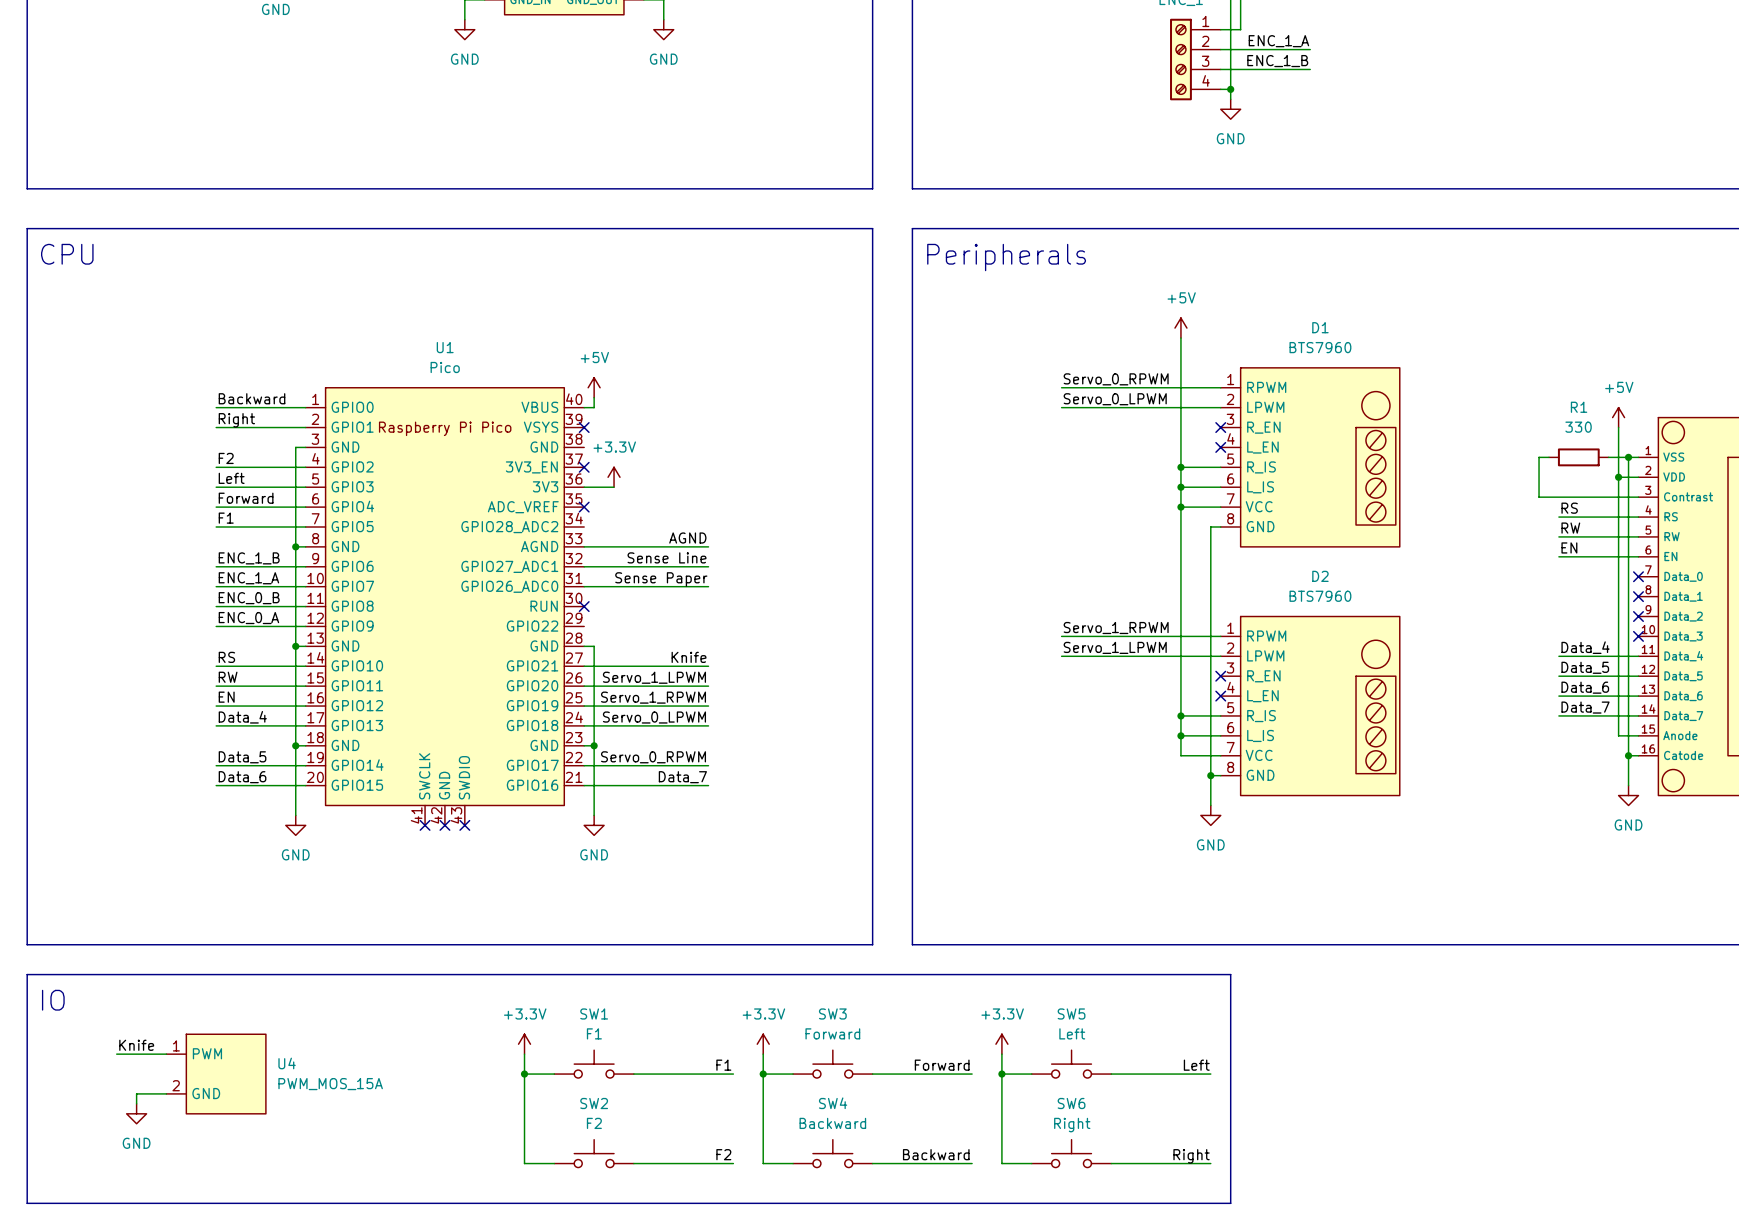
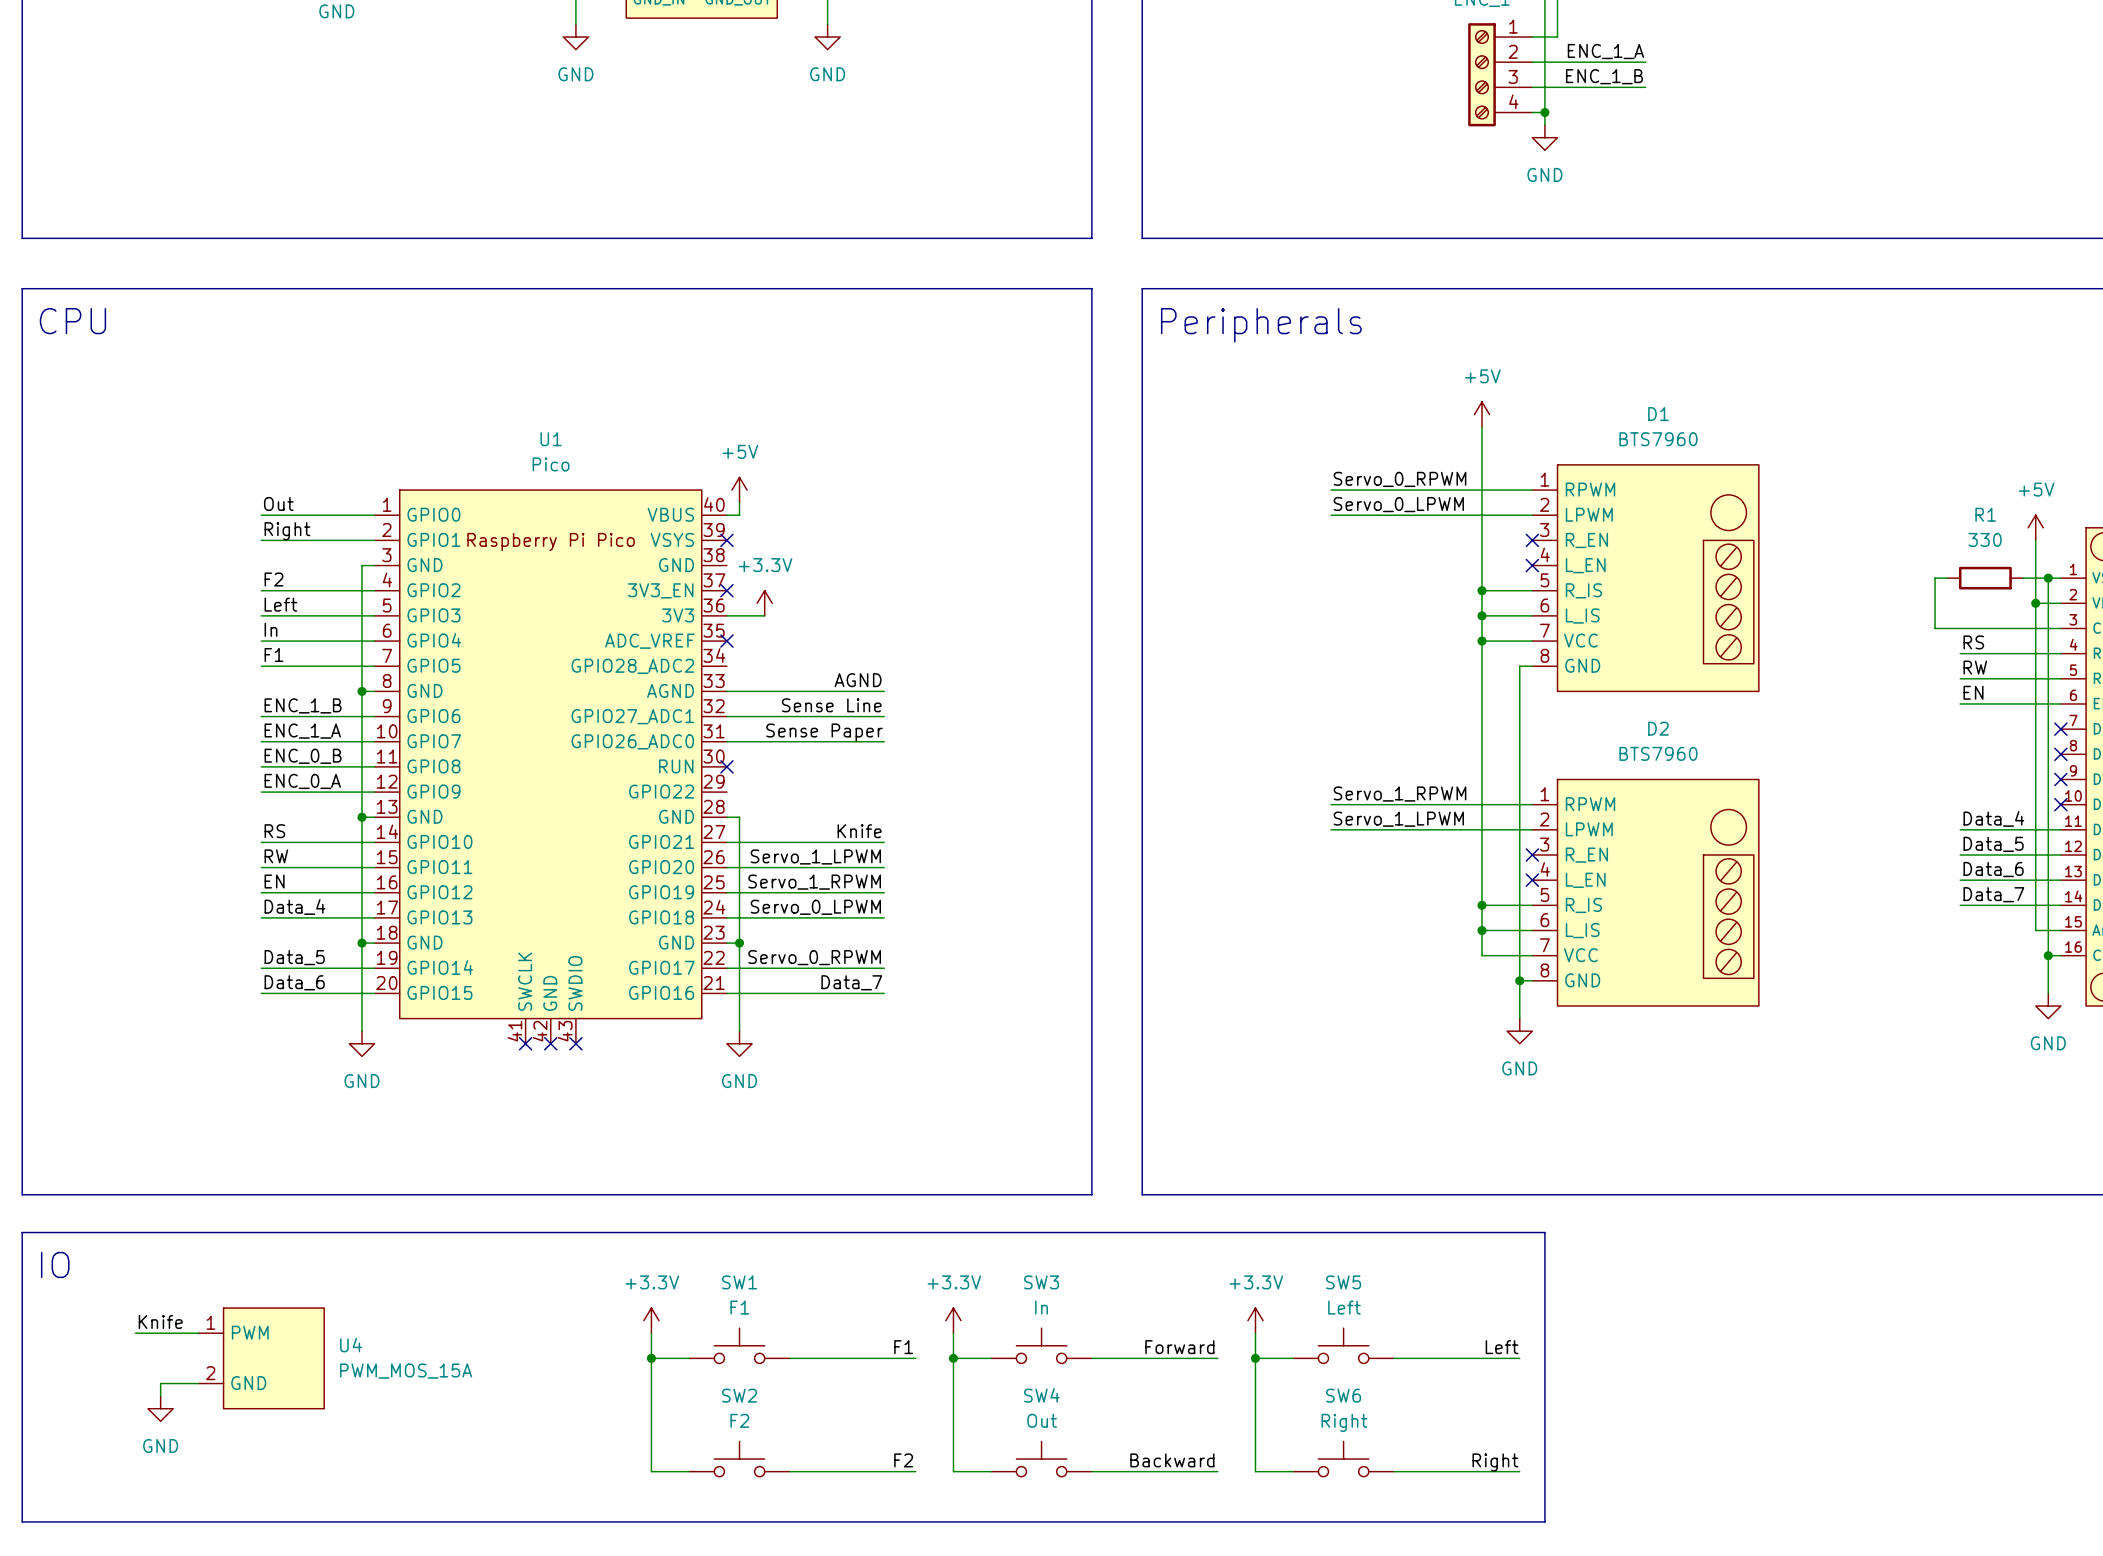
label: Backward (252, 398) -> Out (278, 503)
label: Forward (246, 498) -> In (271, 629)
SW3 value: Forward (832, 1033) -> In (1041, 1307)
SW4 value: Backward (832, 1123) -> Out (1042, 1420)

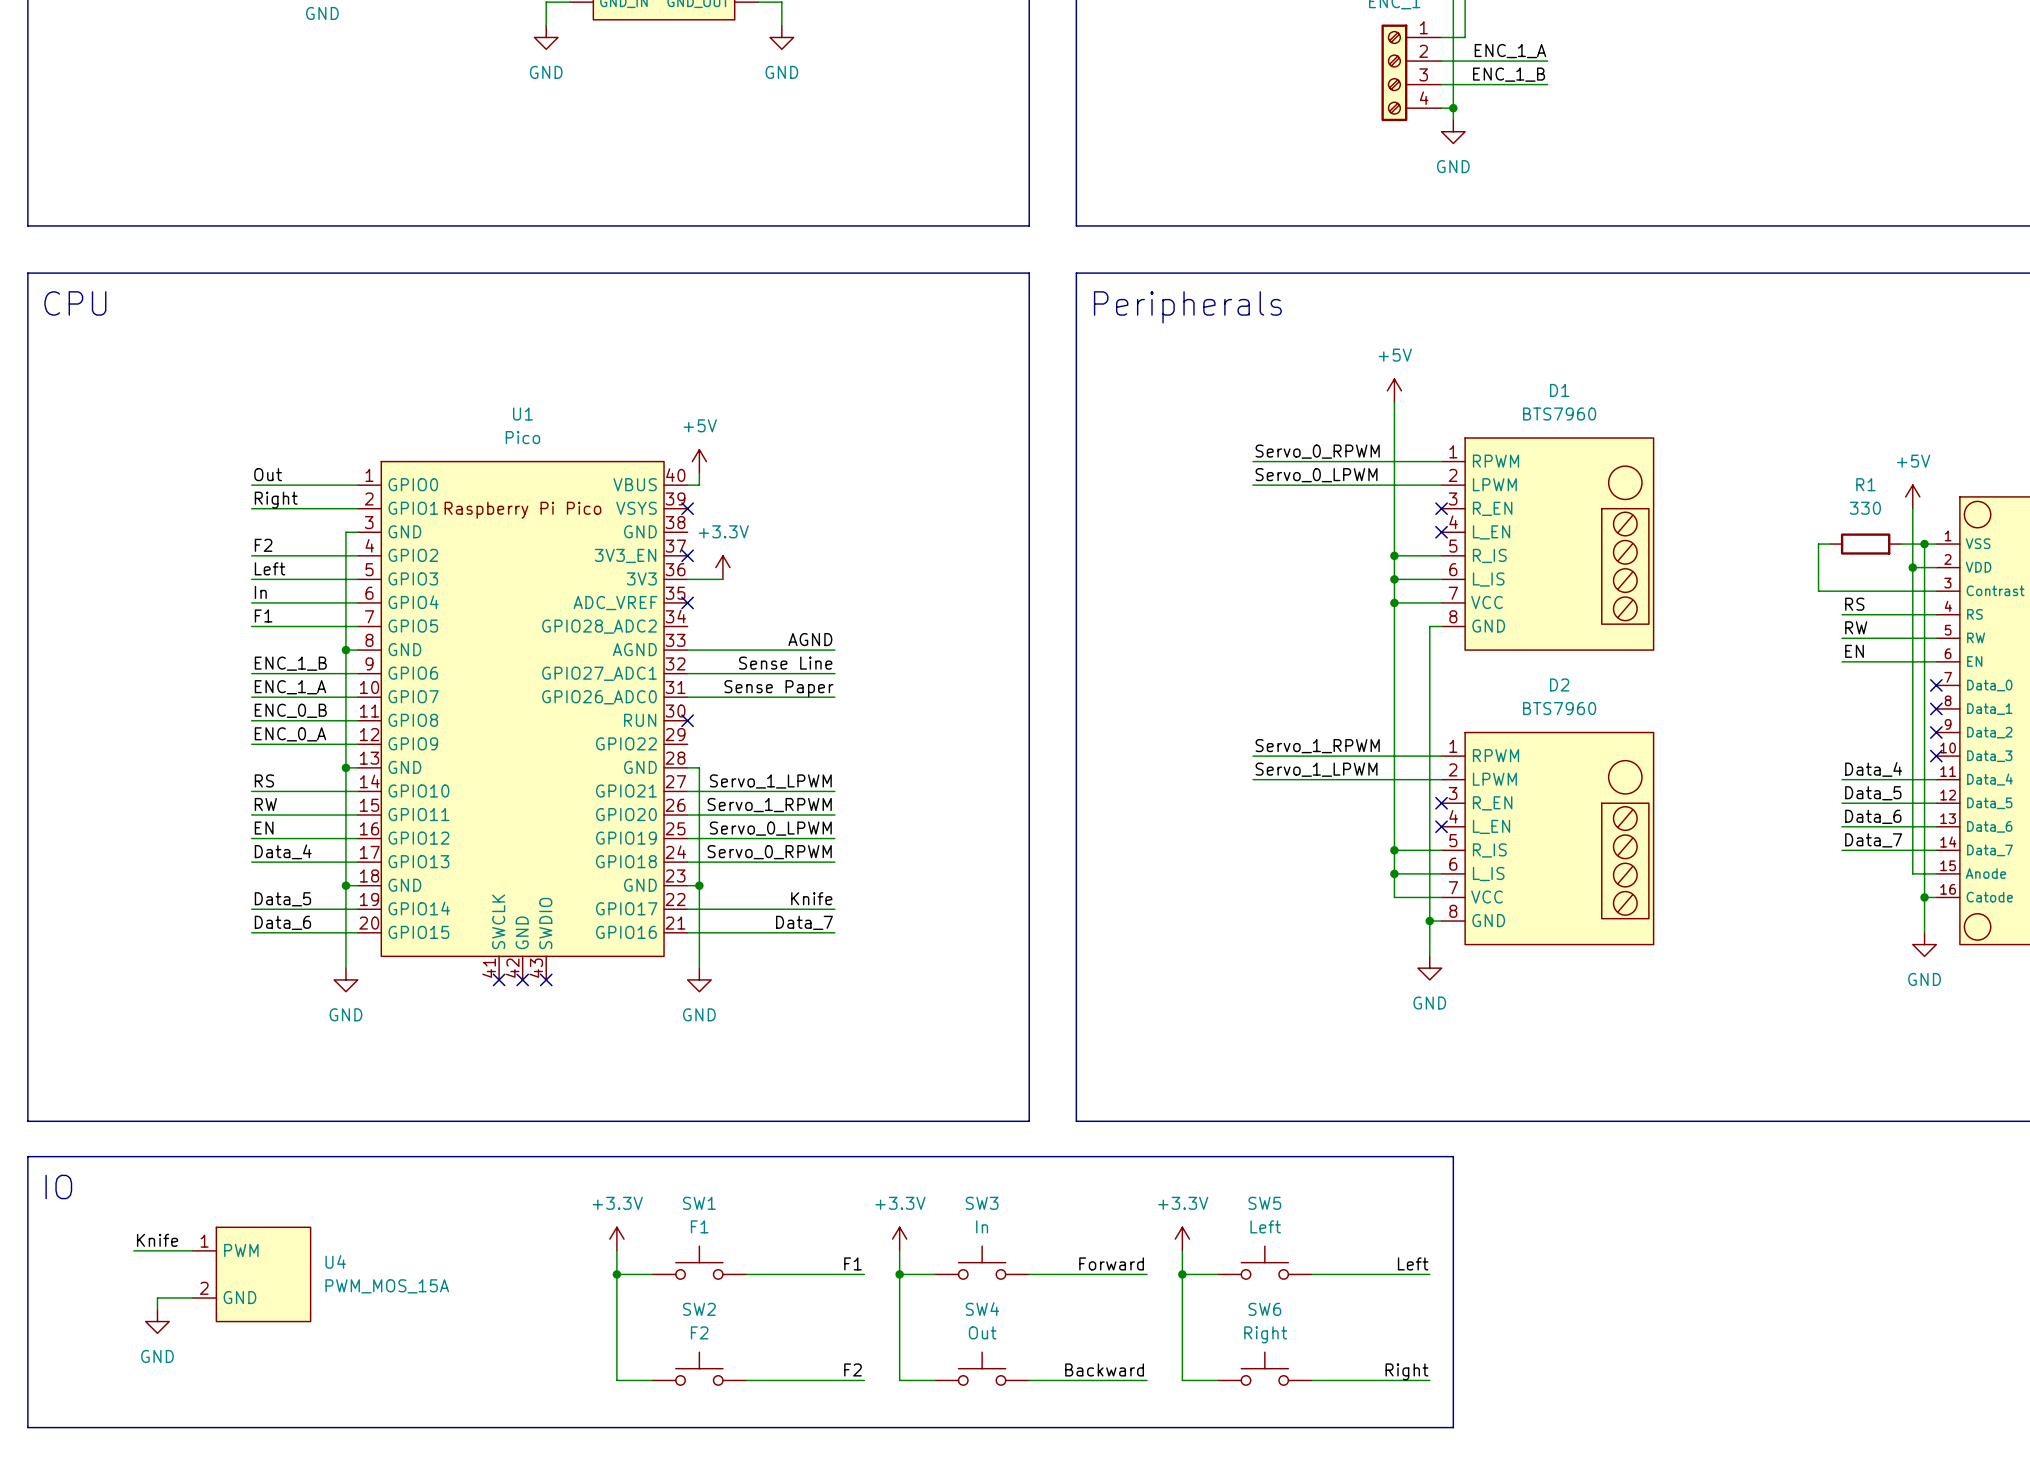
label: Knife (859, 831) -> Servo_1_LPWM (770, 781)
label: Servo_1_LPWM (815, 856) -> Servo_1_RPWM (769, 805)
label: Servo_1_RPWM (814, 882) -> Servo_0_LPWM (770, 828)
label: Servo_0_LPWM (815, 907) -> Servo_0_RPWM (769, 852)
label: Servo_0_RPWM (814, 957) -> Knife (811, 898)

